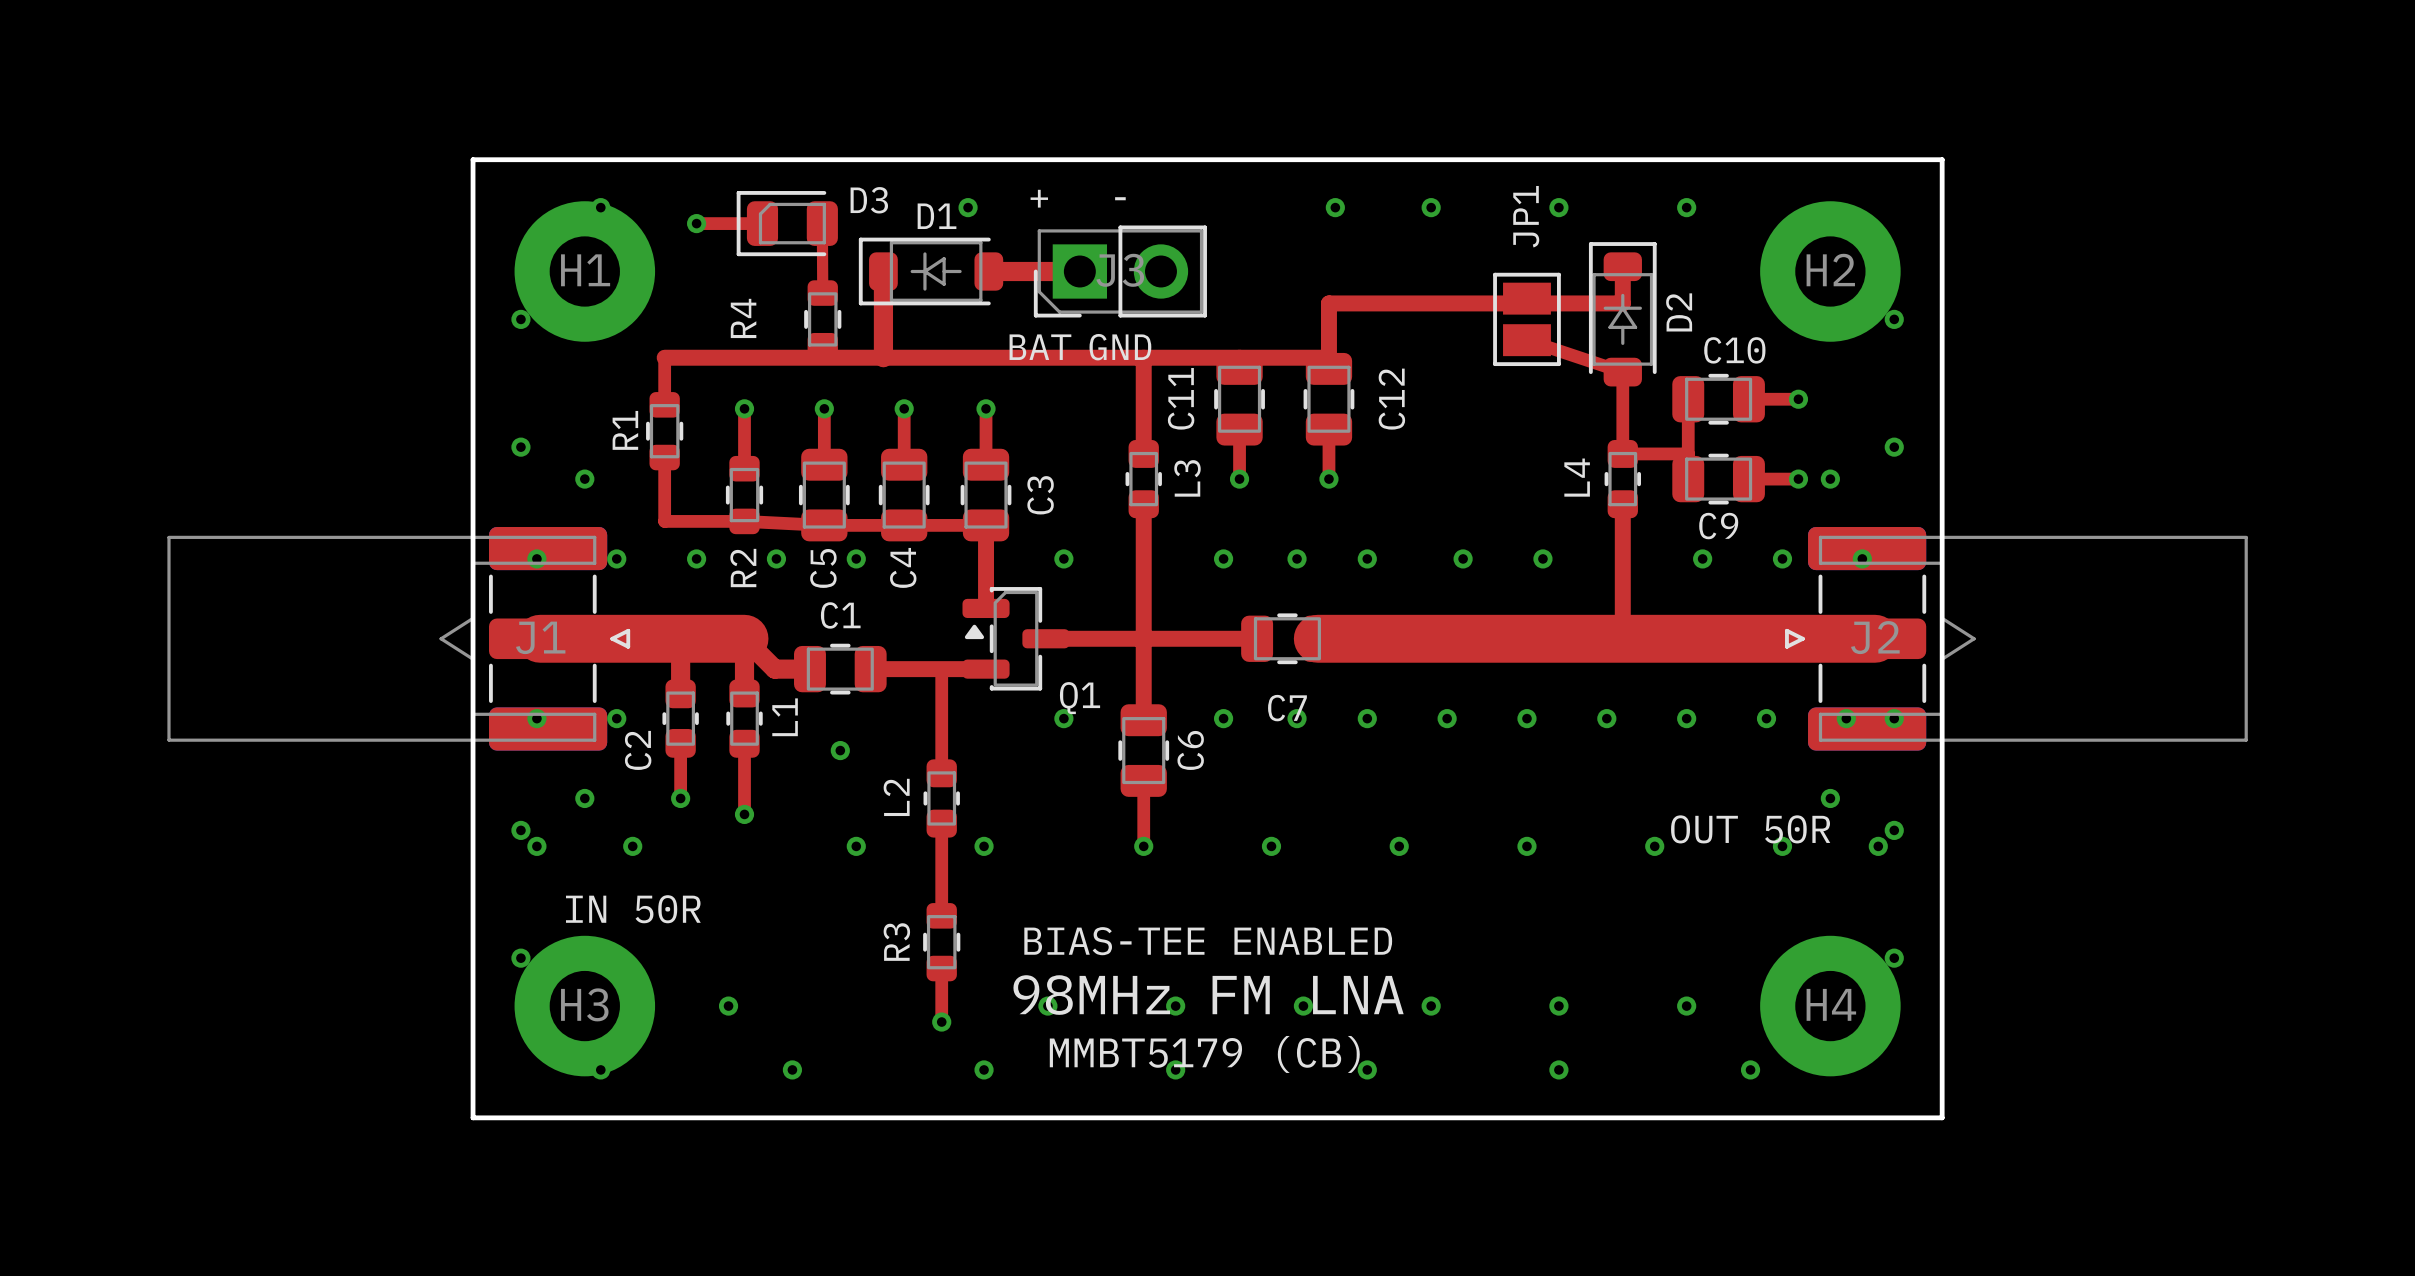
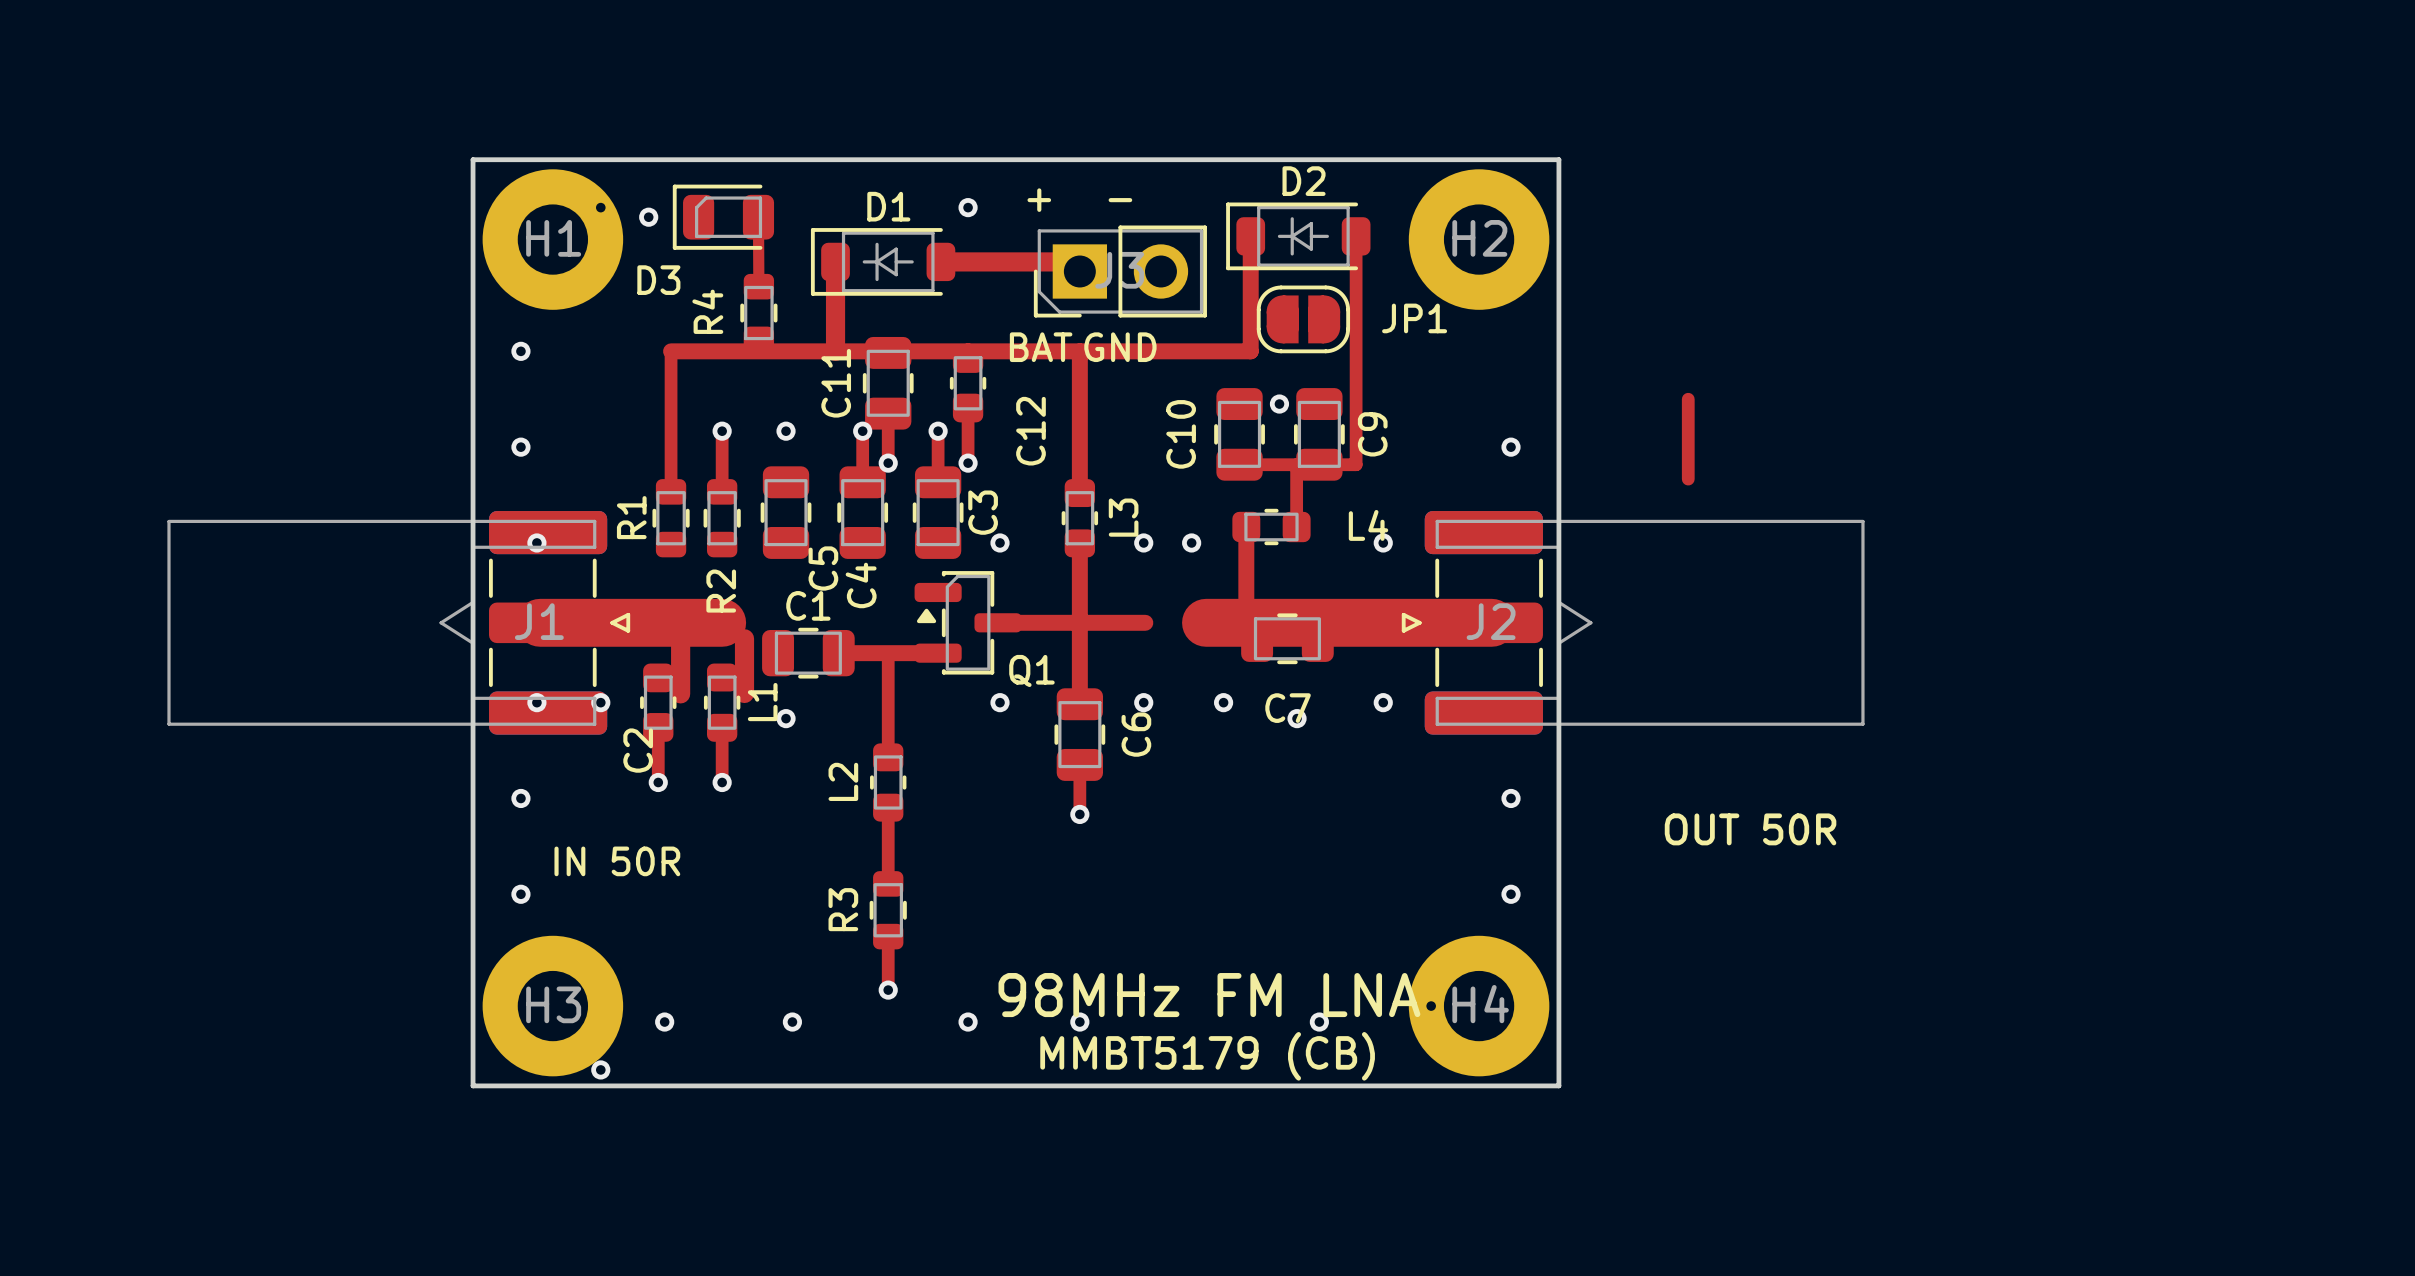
board edge: (1558, 159) (1942, 159) (1942, 1117) (473, 1117) (473, 1085) -> (1558, 159) (1558, 1085) (473, 1085)
D3 name position: D3 (869, 200) -> D3 (658, 280)
via: (1335, 207) -> none
via: (1431, 207) -> none
via: (1558, 207) -> none
via: (1686, 207) -> none
JP1 name position: JP1 (1526, 216) -> JP1 (1414, 318)
top track: (696, 223) (762, 223) -> none
via position: (696, 223) -> (648, 217)
D3 position: (787, 223) -> (723, 217)
top track: (822, 223) (822, 293) -> (758, 217) (758, 286)
top track: none -> (1250, 236) (1250, 351) (671, 351) (671, 491)
top track: none -> (1356, 236) (1356, 464) (1239, 464)
top track: none -> (835, 261) (835, 351)
top track: none -> (940, 261) (1079, 261)
top track: (1622, 266) (1622, 303) (1328, 303) (1328, 368) -> none
H1 position: (584, 271) -> (552, 239)
top track: (883, 271) (883, 357) -> none
D1 position: (931, 271) -> (883, 261)
top track: (988, 271) (1079, 271) -> none
H2 position: (1830, 271) -> (1479, 239)
JP1 footprint: [1493, 272, 1561, 367] -> [1256, 285, 1351, 354]
D2 rotation: 0° (1622, 314) -> 90° counterclockwise (1298, 236)
D2 position: (1622, 314) -> (1298, 236)
R4 name position: R4 (743, 318) -> R4 (707, 311)
via position: (520, 319) -> (520, 351)
R4 position: (822, 319) -> (758, 313)
via: (1894, 319) -> none
top track: (1526, 340) (1622, 372) (1622, 453) (1688, 453) -> none
C10 name position: C10 (1734, 350) -> C10 (1181, 434)
top track: none -> (1079, 351) (1079, 493)
C12 footprint: [1303, 352, 1355, 446] -> [949, 344, 987, 423]
top track: (1143, 357) (1143, 453) -> (1246, 527) (1246, 622)
top track: (1328, 357) (664, 357) (664, 404) -> none
C11 name position: C11 (1181, 398) -> C11 (836, 383)
C11 position: (1239, 399) -> (888, 383)
C10 rotation: 0° (1718, 399) -> 90° clockwise (1239, 434)
C10 position: (1718, 399) -> (1239, 434)
top track: (1748, 399) (1798, 399) -> none
via: (1798, 399) -> none
via: none -> (1279, 404)
top track: (744, 408) (744, 468) -> none
via: (744, 408) -> none
top track: (824, 408) (824, 464) -> none
via: (824, 408) -> none
top track: (904, 408) (904, 464) -> none
via: (904, 408) -> none
top track: none -> (968, 408) (968, 463)
top track: (986, 408) (986, 464) -> none
via: (986, 408) -> none
top track: (1239, 429) (1239, 479) -> (888, 413) (888, 463)
top track: (1328, 429) (1328, 479) -> (1079, 764) (1079, 814)
R1 position: (664, 431) -> (671, 518)
top track: none -> (722, 431) (722, 491)
via: none -> (722, 431)
via: none -> (786, 431)
top track: none -> (862, 431) (862, 482)
via: none -> (862, 431)
top track: none -> (938, 431) (938, 482)
via: none -> (938, 431)
via: none -> (1511, 447)
via: (1894, 447) -> none
top track: (664, 457) (664, 521) (744, 521) (824, 525) (986, 525) (986, 608) -> none
via: none -> (888, 463)
via: none -> (968, 463)
top track: none -> (1296, 464) (1296, 527)
L4 name position: L4 (1577, 477) -> L4 (1368, 525)
via: (584, 479) -> none
L3 position: (1143, 479) -> (1079, 518)
via: (1239, 479) -> none
via: (1328, 479) -> none
L4 rotation: 0° (1622, 479) -> 90° clockwise (1271, 527)
L4 position: (1622, 479) -> (1271, 527)
C9 rotation: 0° (1718, 479) -> 90° clockwise (1319, 434)
C9 position: (1718, 479) -> (1319, 434)
top track: (1748, 479) (1798, 479) -> none
via: (1798, 479) -> none
via: (1830, 479) -> none
R2 position: (744, 495) -> (722, 518)
C5 position: (824, 495) -> (786, 512)
C4 position: (904, 495) -> (862, 512)
C3 position: (986, 495) -> (938, 512)
C3 name position: C3 (1040, 495) -> C3 (983, 512)
top track: (1143, 504) (1143, 720) -> none
top track: (1622, 504) (1622, 638) -> none
C9 name position: C9 (1718, 526) -> C9 (1372, 434)
via: none -> (1000, 542)
via: none -> (1143, 542)
top track: none -> (1079, 543) (1079, 704)
via position: (536, 558) -> (536, 542)
via: (616, 558) -> none
via: (696, 558) -> none
via: (776, 558) -> none
via: (856, 558) -> none
via: (1063, 558) -> none
via position: (1223, 558) -> (1191, 542)
via: (1297, 558) -> none
via position: (1367, 558) -> (1383, 542)
via: (1463, 558) -> none
via: (1542, 558) -> none
via: (1702, 558) -> none
via: (1782, 558) -> none
via: (1862, 558) -> none
C1 name position: C1 (840, 615) -> C1 (808, 605)
top track: none -> (540, 622) (722, 622)
top track: none -> (998, 622) (1145, 622)
top track: none -> (1206, 622) (1491, 622)
J1 position: (398, 638) -> (398, 622)
top track: (540, 638) (744, 638) (774, 669) (809, 669) -> none
Q1 position: (1015, 638) -> (968, 622)
top track: (1045, 638) (1257, 638) -> none
top track: (1317, 638) (1875, 638) -> none
J2 position: (2016, 638) -> (1633, 622)
top track: none -> (838, 653) (938, 653)
C1 position: (840, 669) -> (808, 653)
top track: (870, 669) (986, 669) -> none
top track: (941, 669) (941, 773) -> (888, 653) (888, 757)
Q1 name position: Q1 (1080, 698) -> Q1 (1031, 670)
via: none -> (1000, 702)
via: none -> (1143, 702)
via position: (536, 718) -> (536, 702)
via position: (616, 718) -> (600, 702)
C2 position: (680, 718) -> (658, 702)
L1 position: (744, 718) -> (722, 702)
via: none -> (786, 718)
via: (1063, 718) -> none
via position: (1223, 718) -> (1223, 702)
via position: (1367, 718) -> (1383, 702)
via: (1447, 718) -> none
via: (1526, 718) -> none
via: (1606, 718) -> none
via: (1686, 718) -> none
via: (1766, 718) -> none
via: (1846, 718) -> none
via: (1894, 718) -> none
top track: none -> (722, 727) (722, 782)
top track: (680, 743) (680, 798) -> (658, 727) (658, 782)
top track: (744, 743) (744, 814) -> none
via: (840, 750) -> none
C6 position: (1143, 750) -> (1079, 734)
C6 name position: C6 (1190, 750) -> C6 (1136, 734)
top track: (1143, 780) (1143, 846) -> none
via: none -> (658, 782)
via: none -> (722, 782)
via: none -> (520, 798)
via: (584, 798) -> none
via: (680, 798) -> none
L2 position: (941, 798) -> (888, 782)
via: none -> (1511, 798)
via: (1830, 798) -> none
top track: none -> (888, 807) (888, 883)
via: (744, 814) -> none
via: none -> (1079, 814)
top track: (941, 823) (941, 915) -> none
via: (520, 830) -> none
via: (1894, 830) -> none
via: (536, 846) -> none
via: (632, 846) -> none
via: (856, 846) -> none
via: (984, 846) -> none
via: (1143, 846) -> none
via: (1271, 846) -> none
via: (1399, 846) -> none
via: (1526, 846) -> none
via: (1654, 846) -> none
via: (1782, 846) -> none
via: (1878, 846) -> none
via: none -> (520, 894)
via: none -> (1511, 894)
text position: IN 50R (633, 909) -> IN 50R (617, 861)
text: BIAS-TEE ENABLED (1208, 941) -> none
R3 position: (941, 942) -> (888, 910)
via: (520, 958) -> none
via: (1894, 958) -> none
top track: (941, 968) (941, 1022) -> (888, 936) (888, 990)
via: none -> (888, 990)
H3 position: (584, 1006) -> (552, 1006)
via: (728, 1006) -> none
via position: (1047, 1006) -> (1079, 1022)
via: (1175, 1006) -> none
via position: (1303, 1006) -> (1319, 1022)
via: (1558, 1006) -> none
via: (1686, 1006) -> none
H4 position: (1830, 1006) -> (1479, 1006)
via: none -> (664, 1022)
via: none -> (792, 1022)
via: (941, 1022) -> none
via: none -> (968, 1022)
via: (792, 1069) -> none
via: (984, 1069) -> none
via: (1175, 1069) -> none
via: (1367, 1069) -> none
via: (1558, 1069) -> none
via: (1750, 1069) -> none

